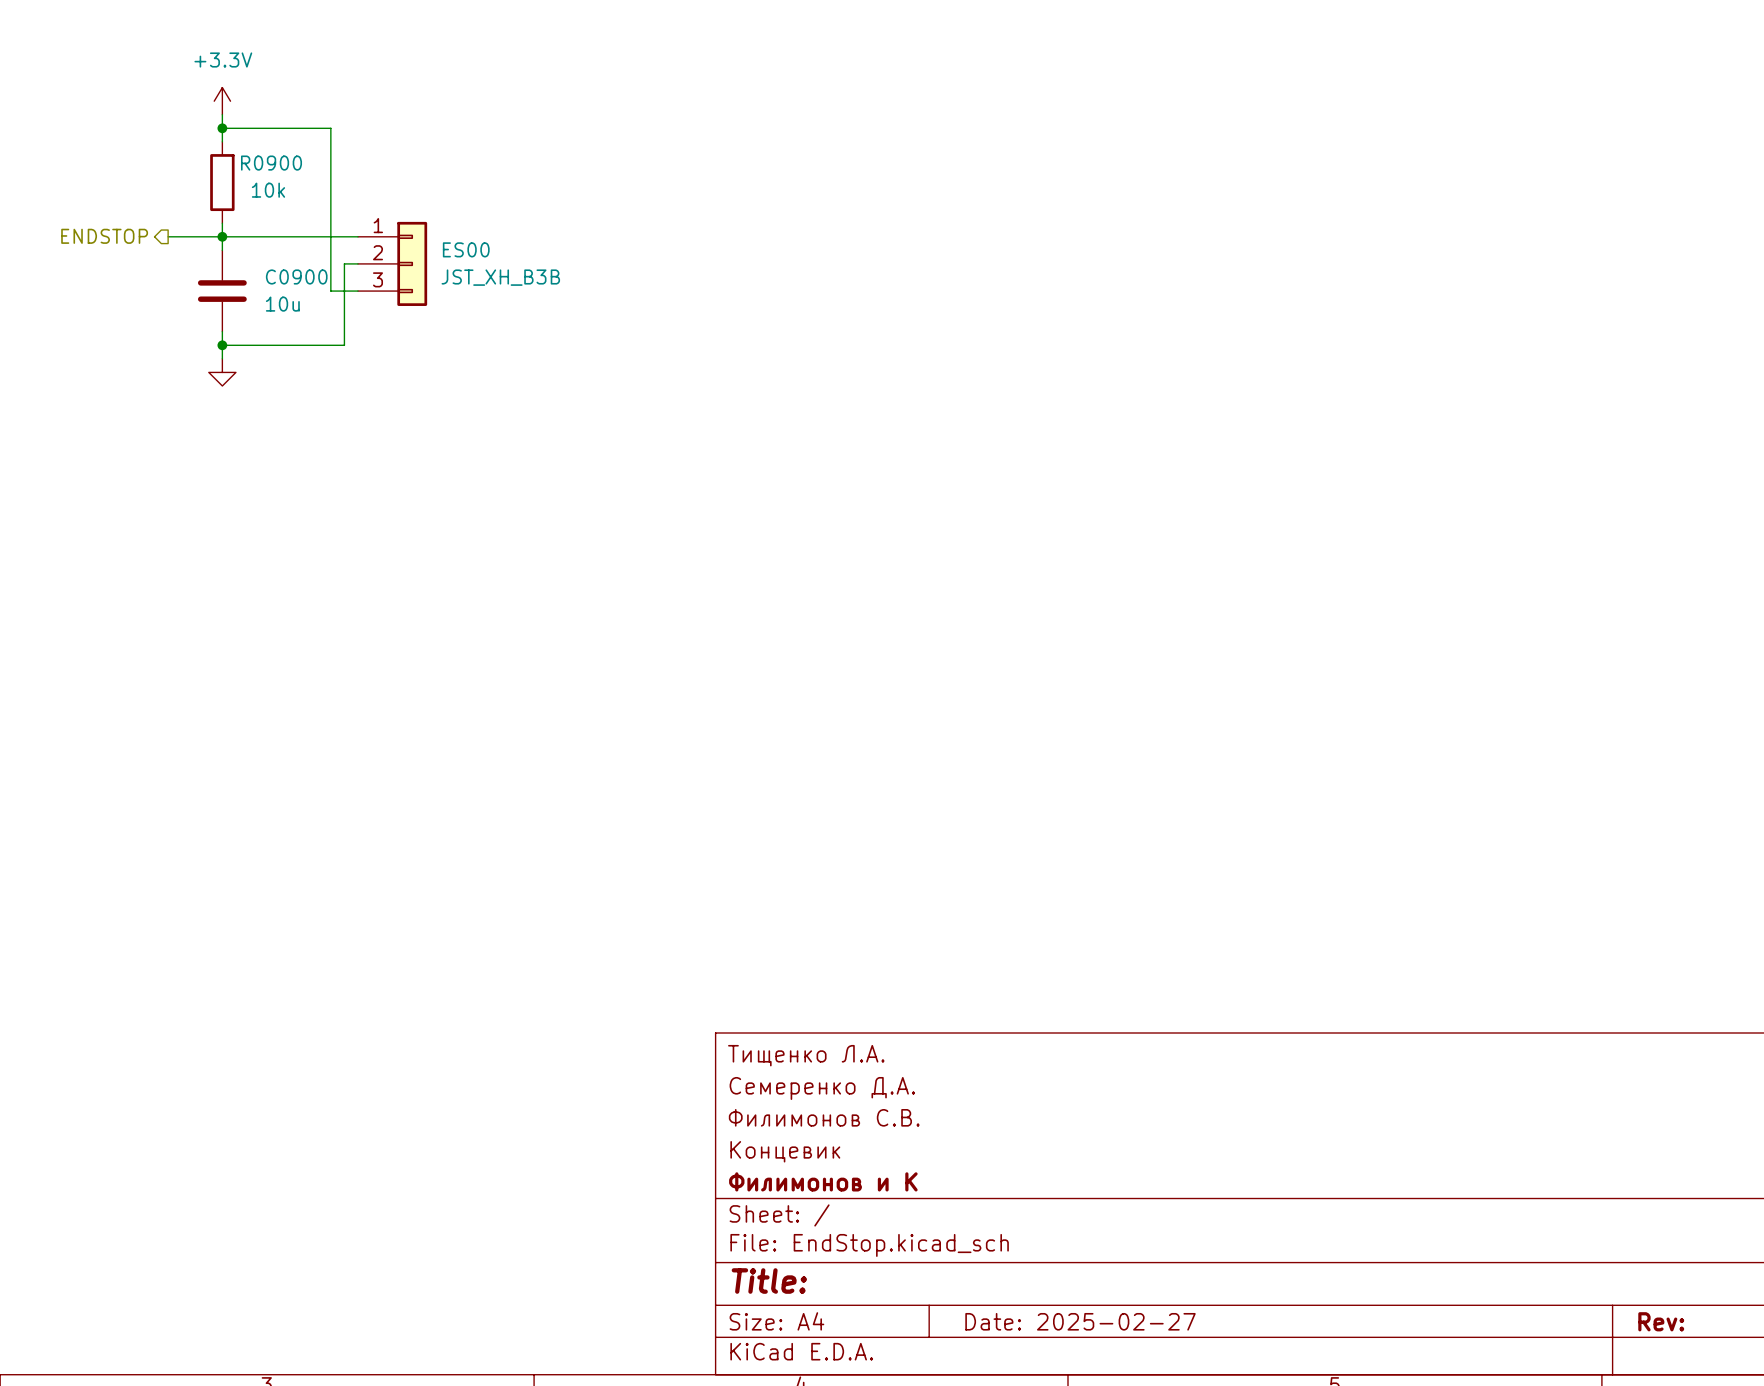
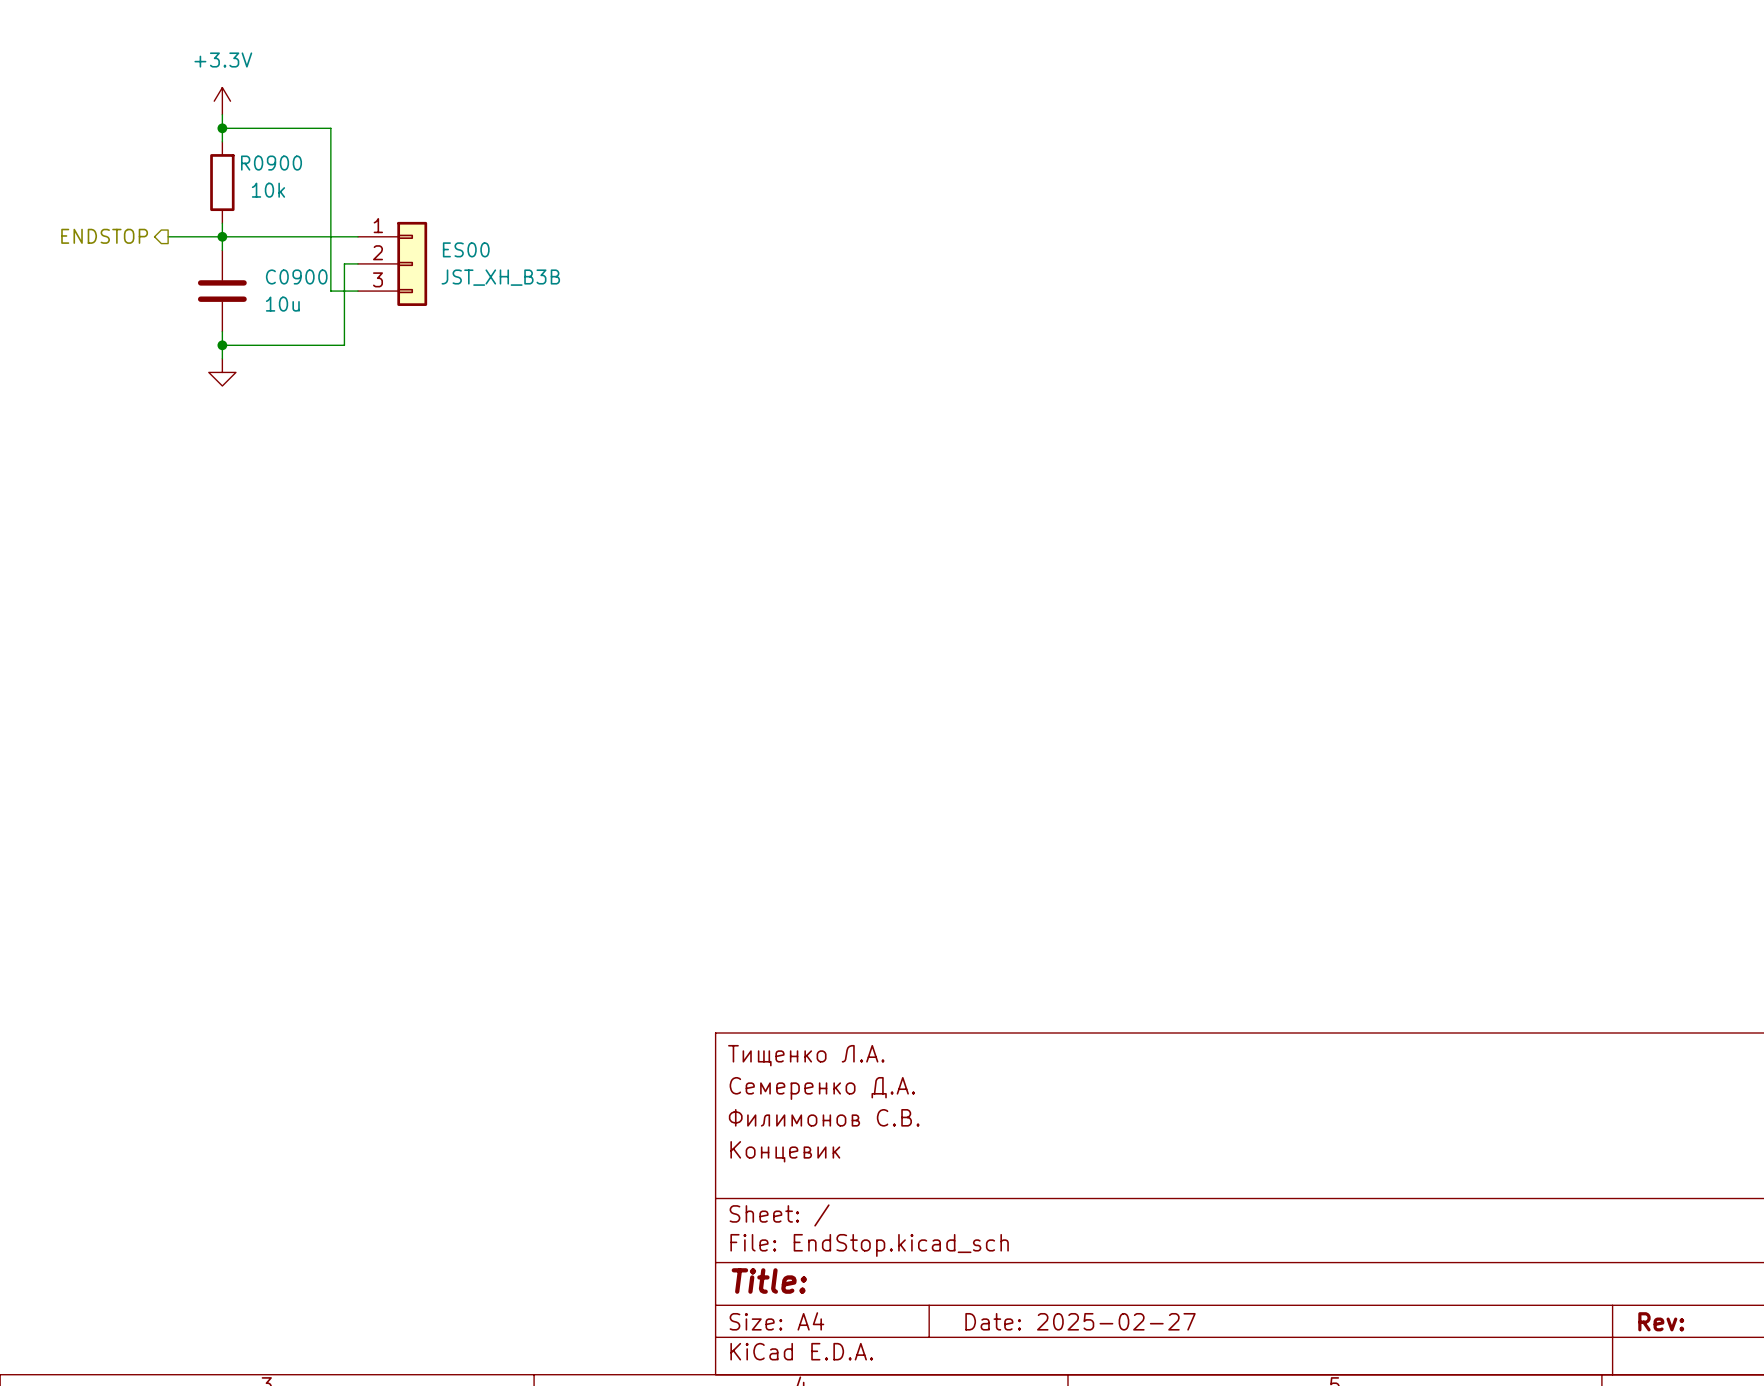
title block: Филимонов и К (823, 1181) -> none

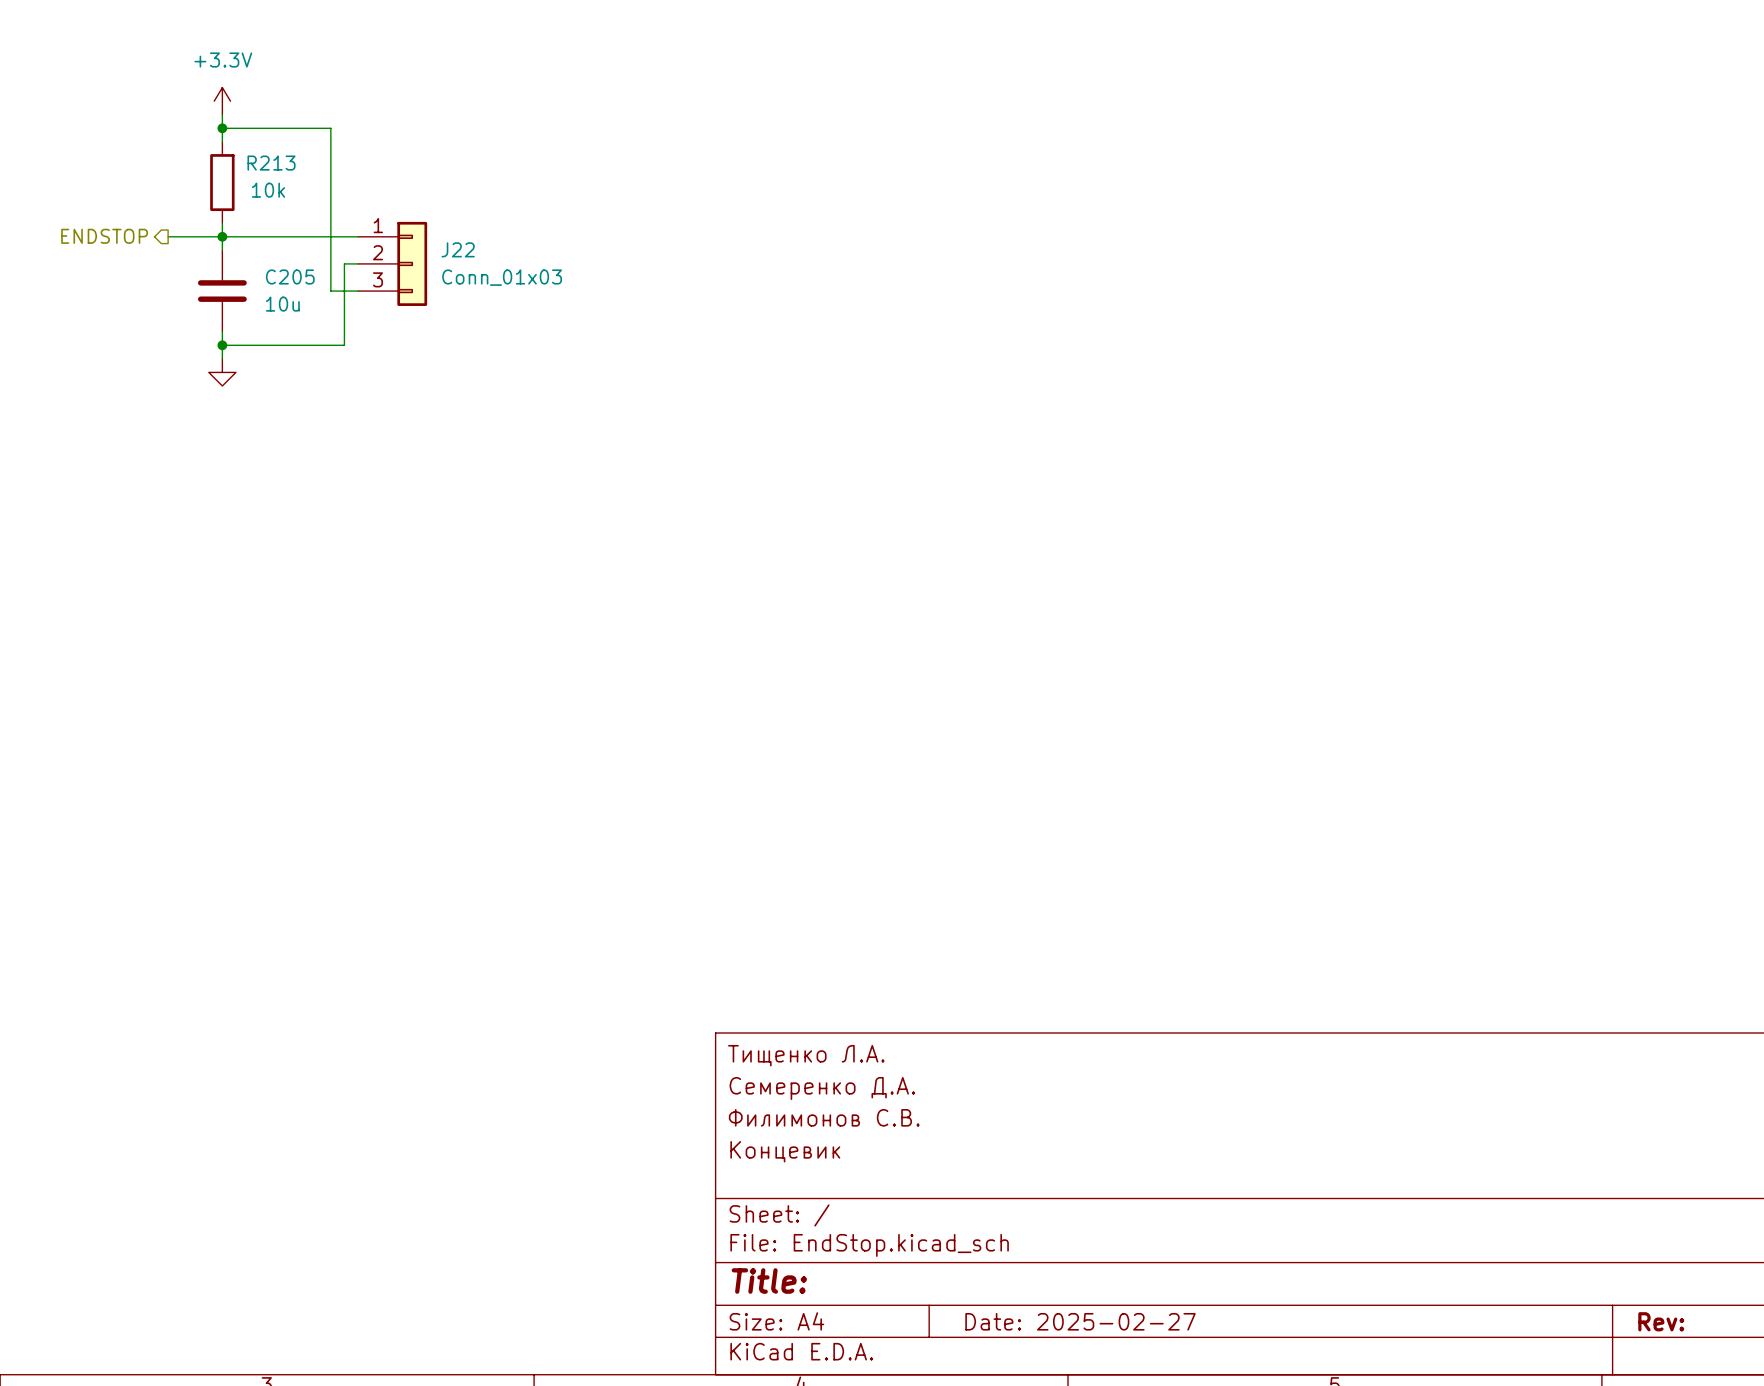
R0900 name: R0900 (271, 163) -> R213 (271, 163)
ES00 name: ES00 (466, 249) -> J22 (458, 249)
C0900 name: C0900 (296, 276) -> C205 (290, 276)
ES00 value: JST_XH_B3B (500, 277) -> Conn_01x03 (502, 277)

